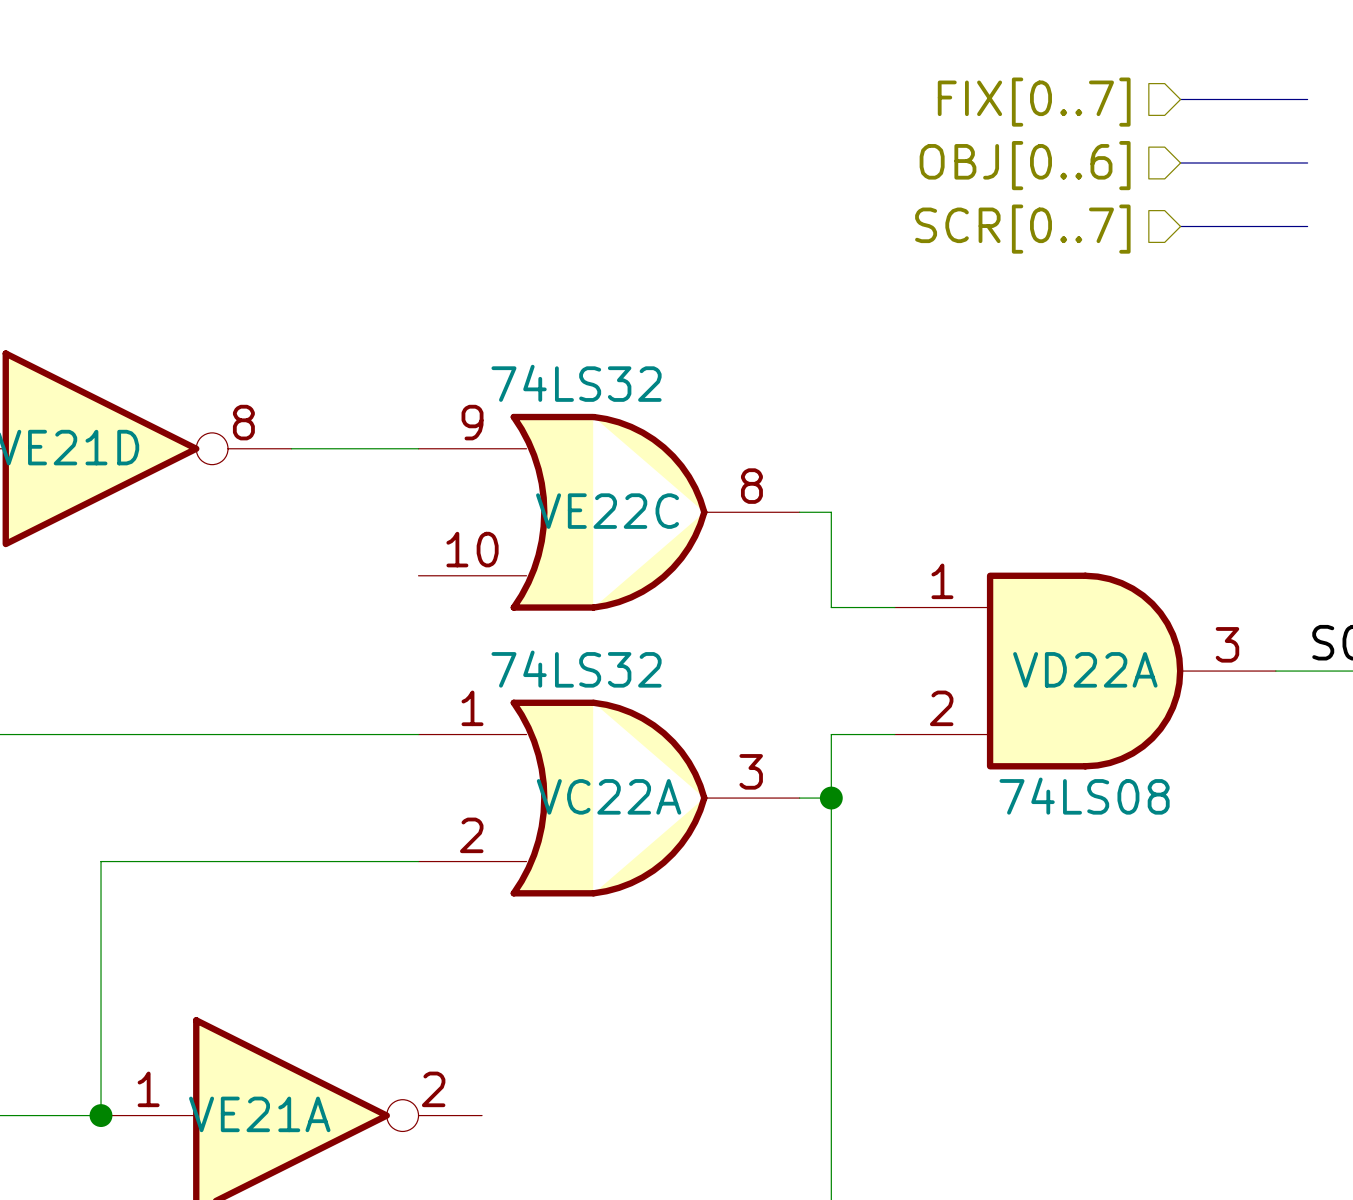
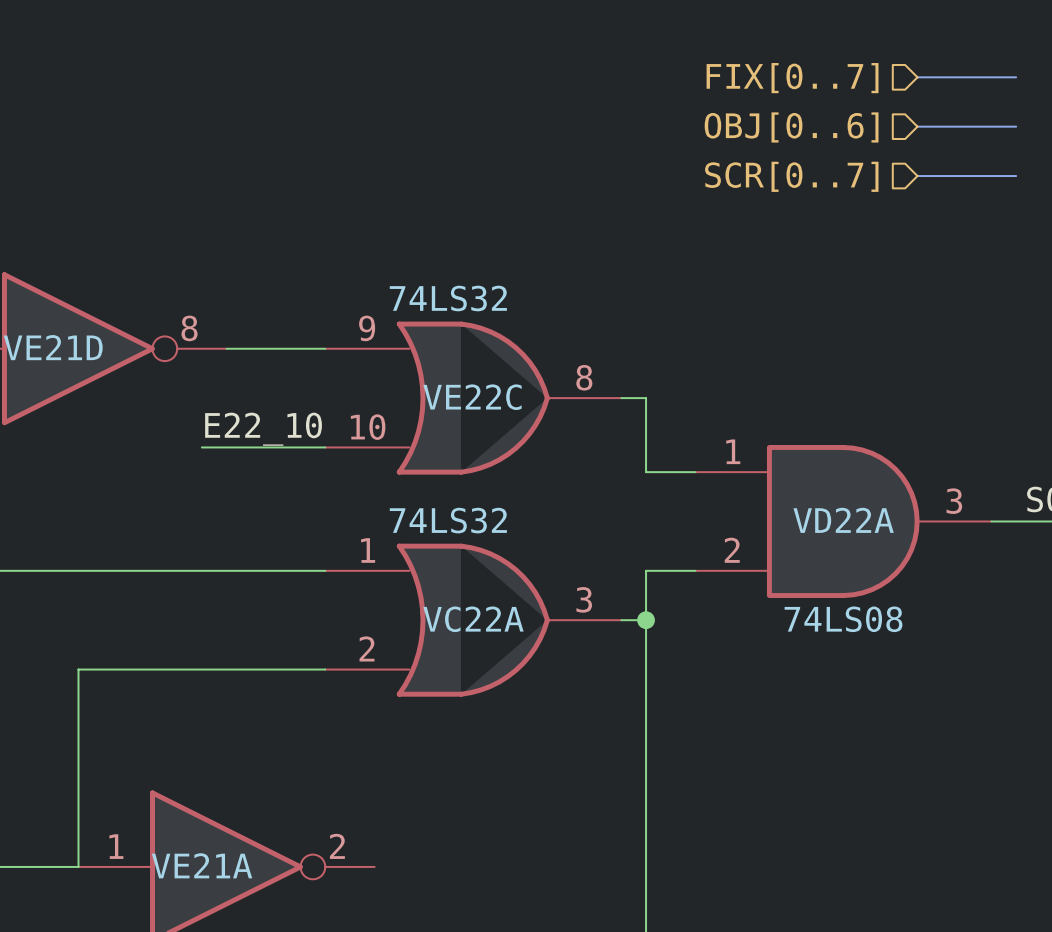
label: none -> E22_10 (263, 429)
wire: none -> (201, 447) (325, 447)
junction: (101, 1115) -> none

